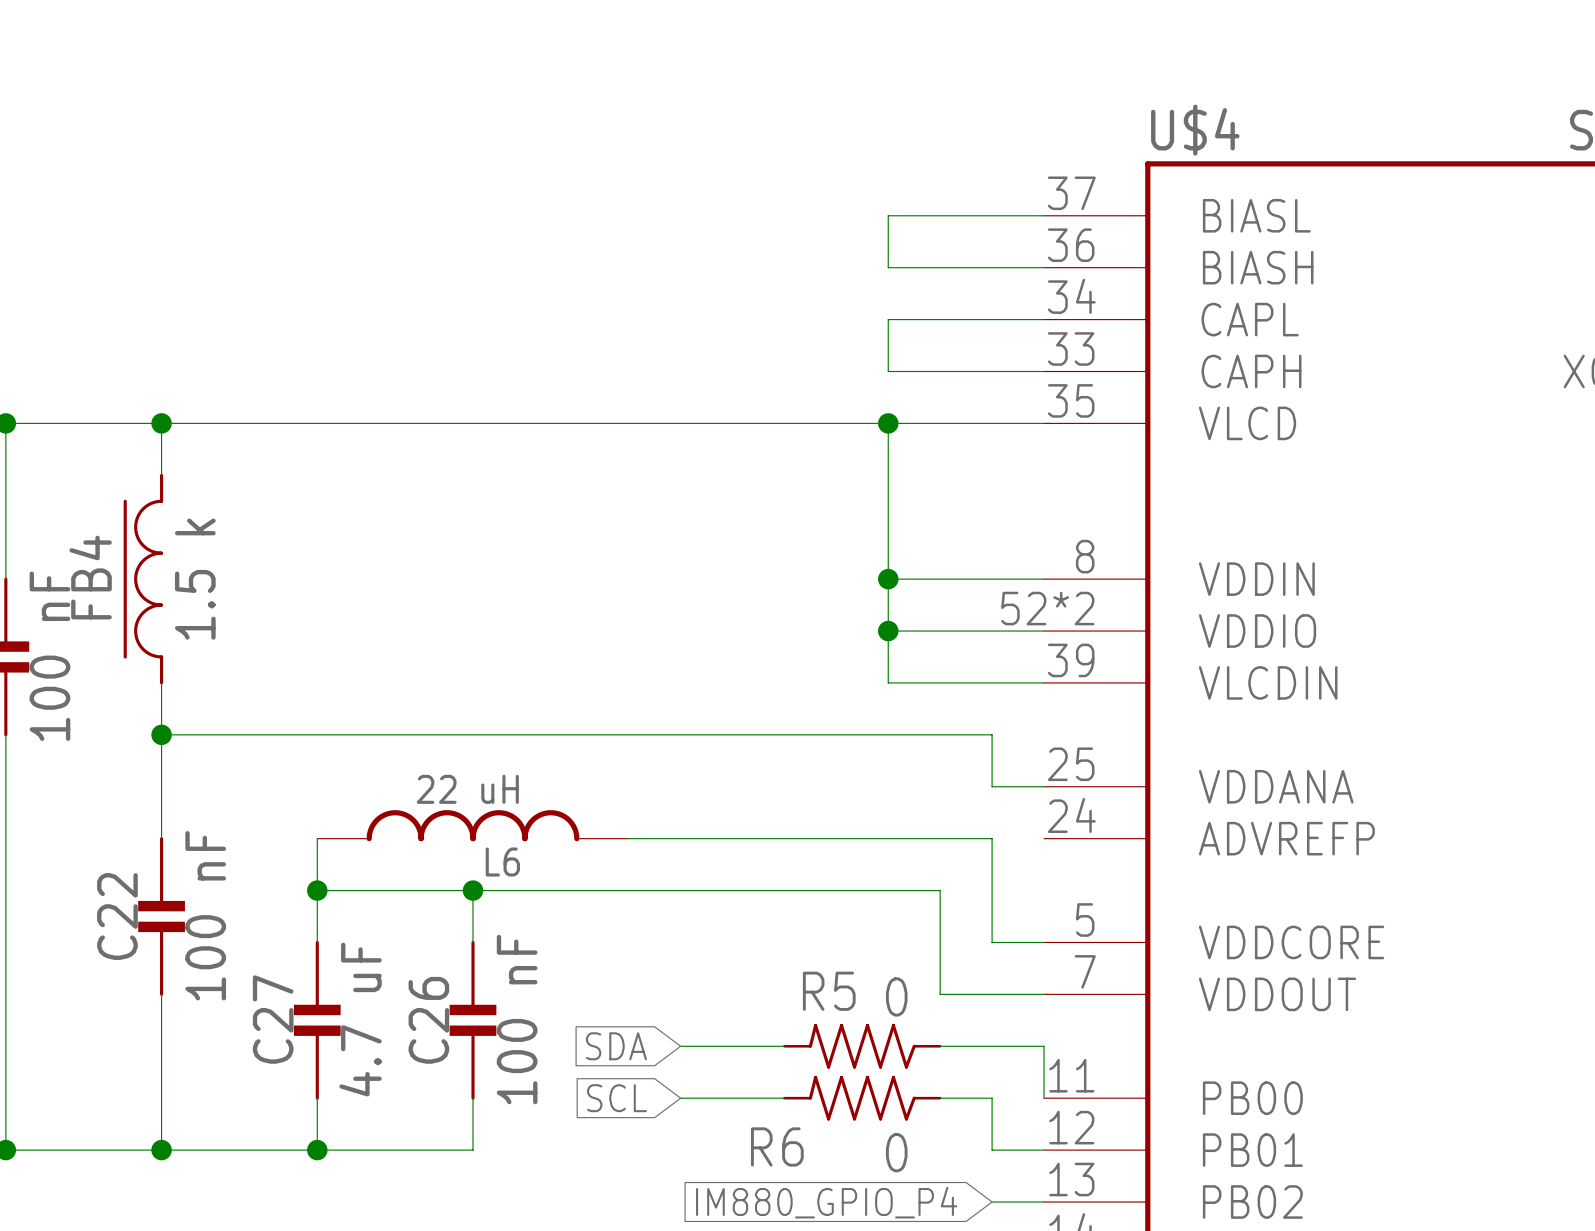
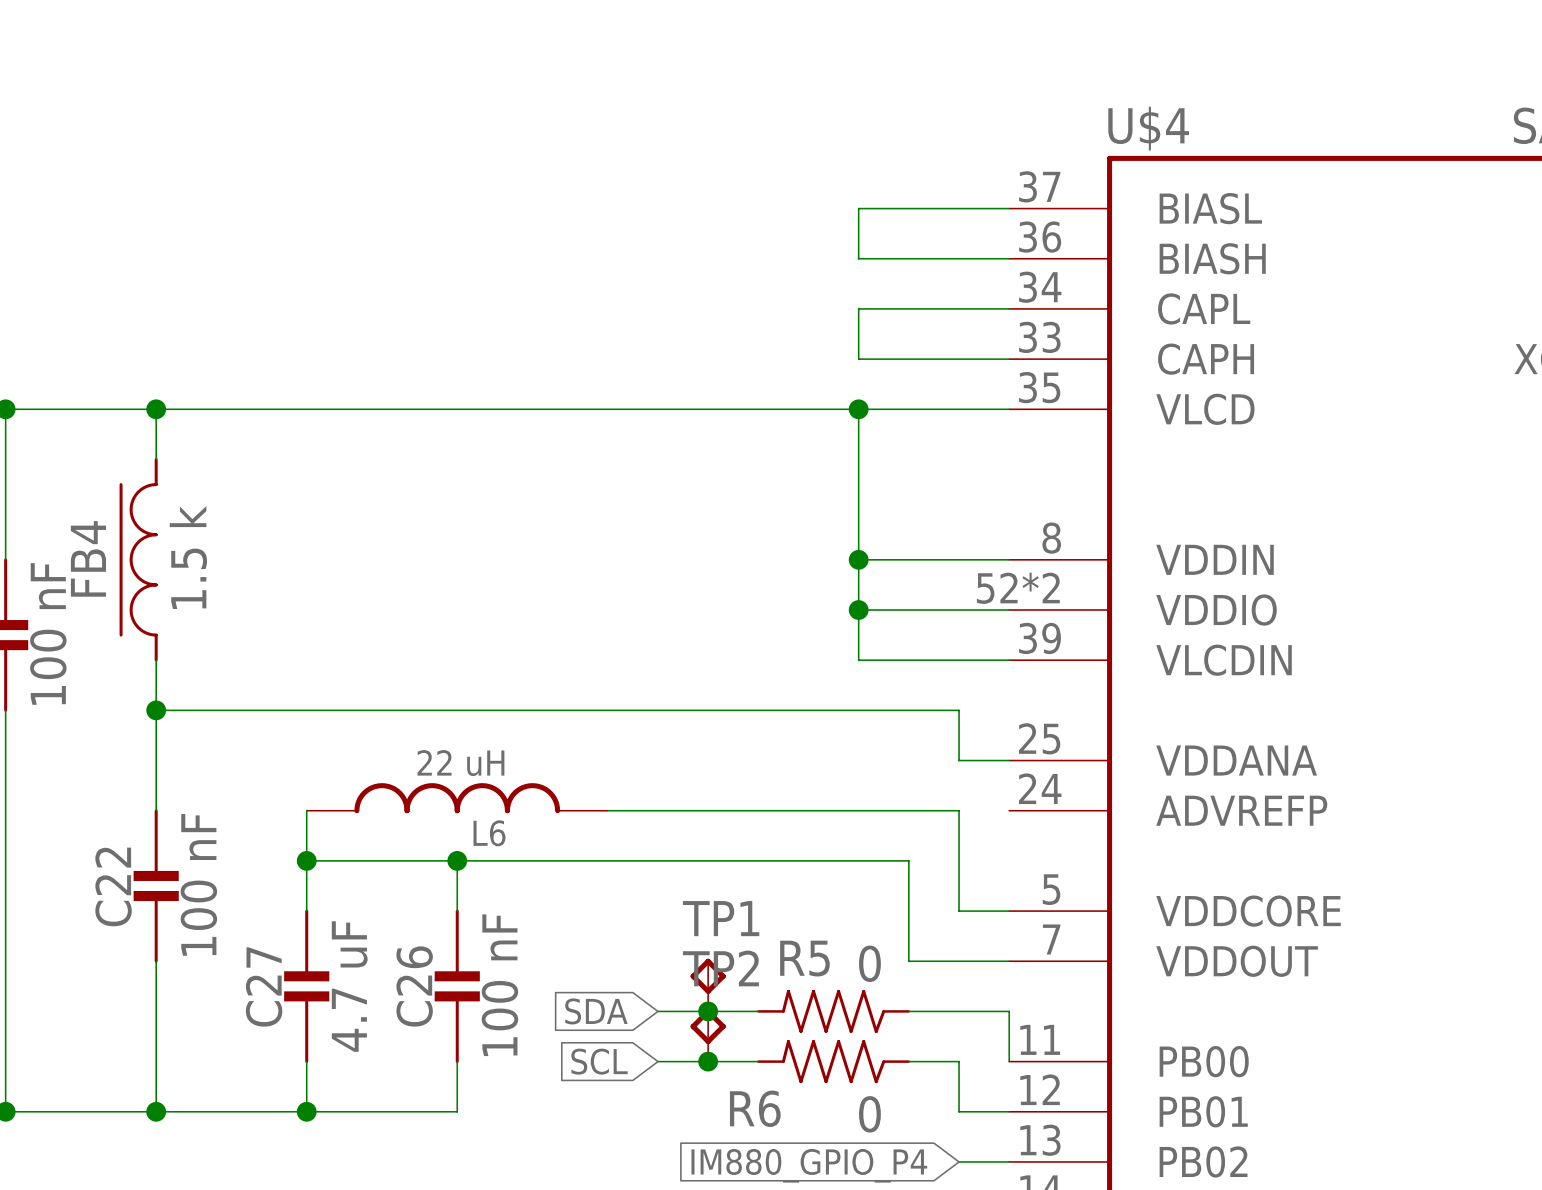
TP1: none -> (708, 985)
junction: none -> (708, 1011)
TP2: none -> (708, 1035)
junction: none -> (708, 1061)

